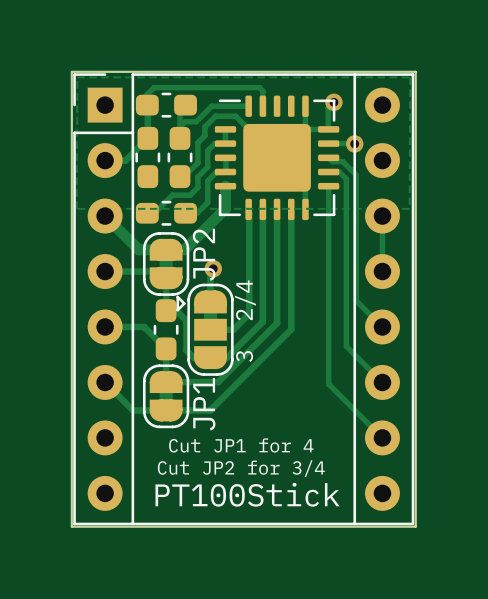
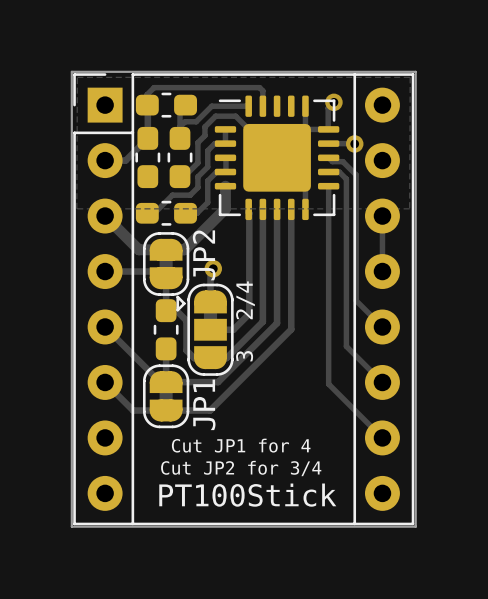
track: (105, 326) (144, 326) (166, 348) -> (105, 326) (160, 382) (166, 382)

